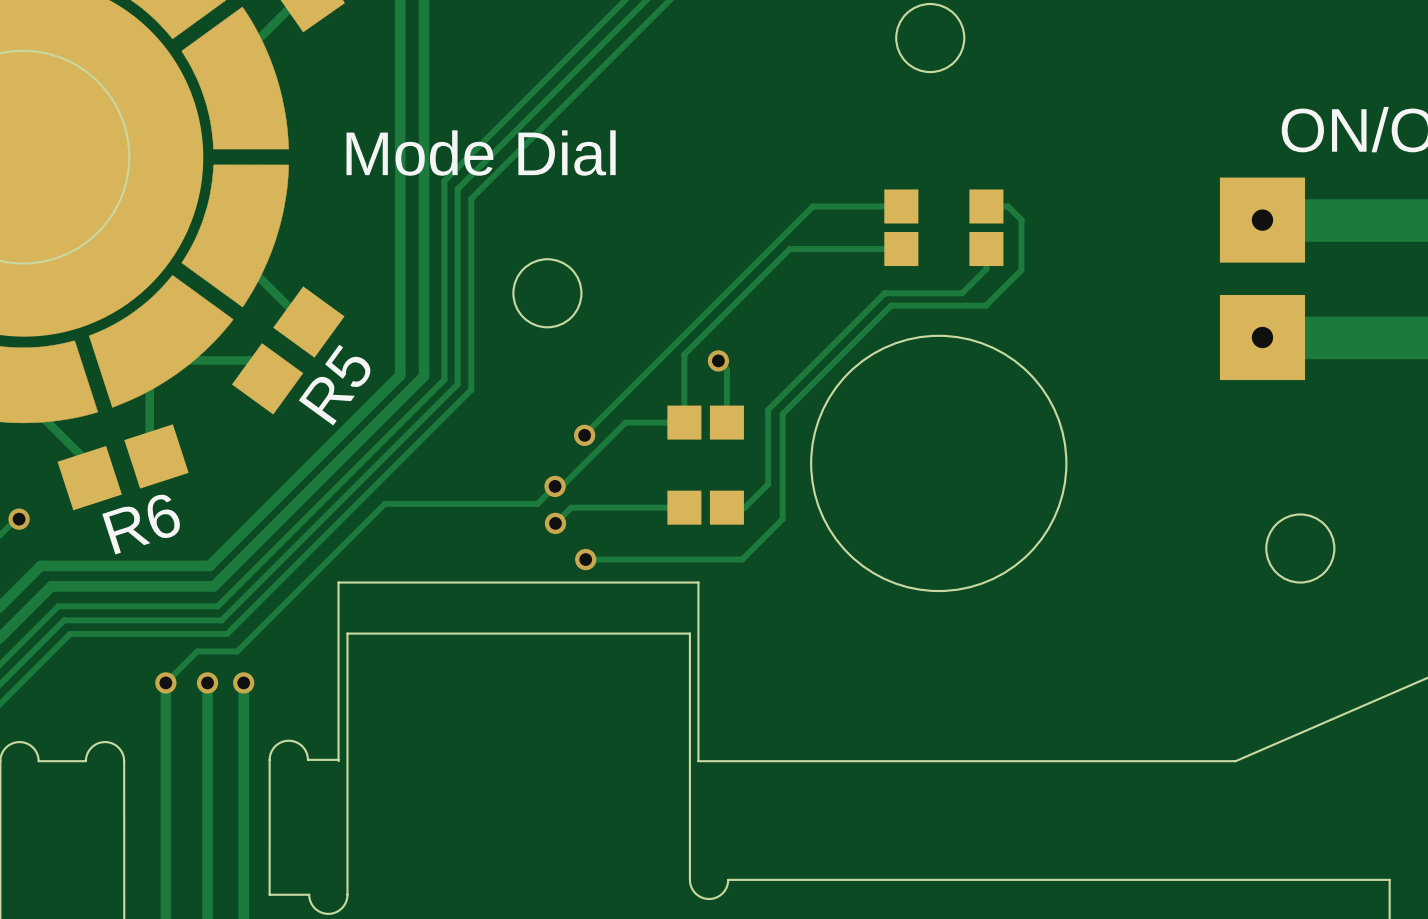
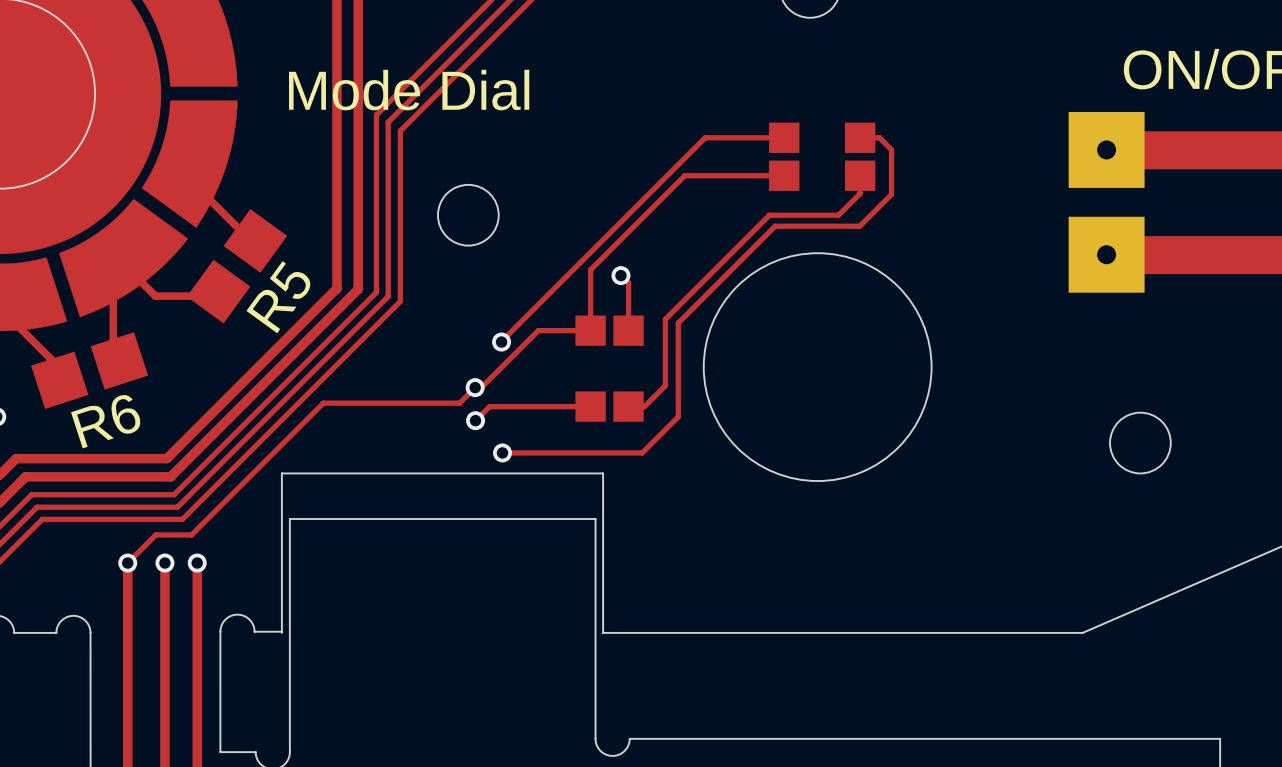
track: (173, 360) (249, 360) (267, 378) -> (134, 275) (155, 296) (214, 296) (218, 291)

